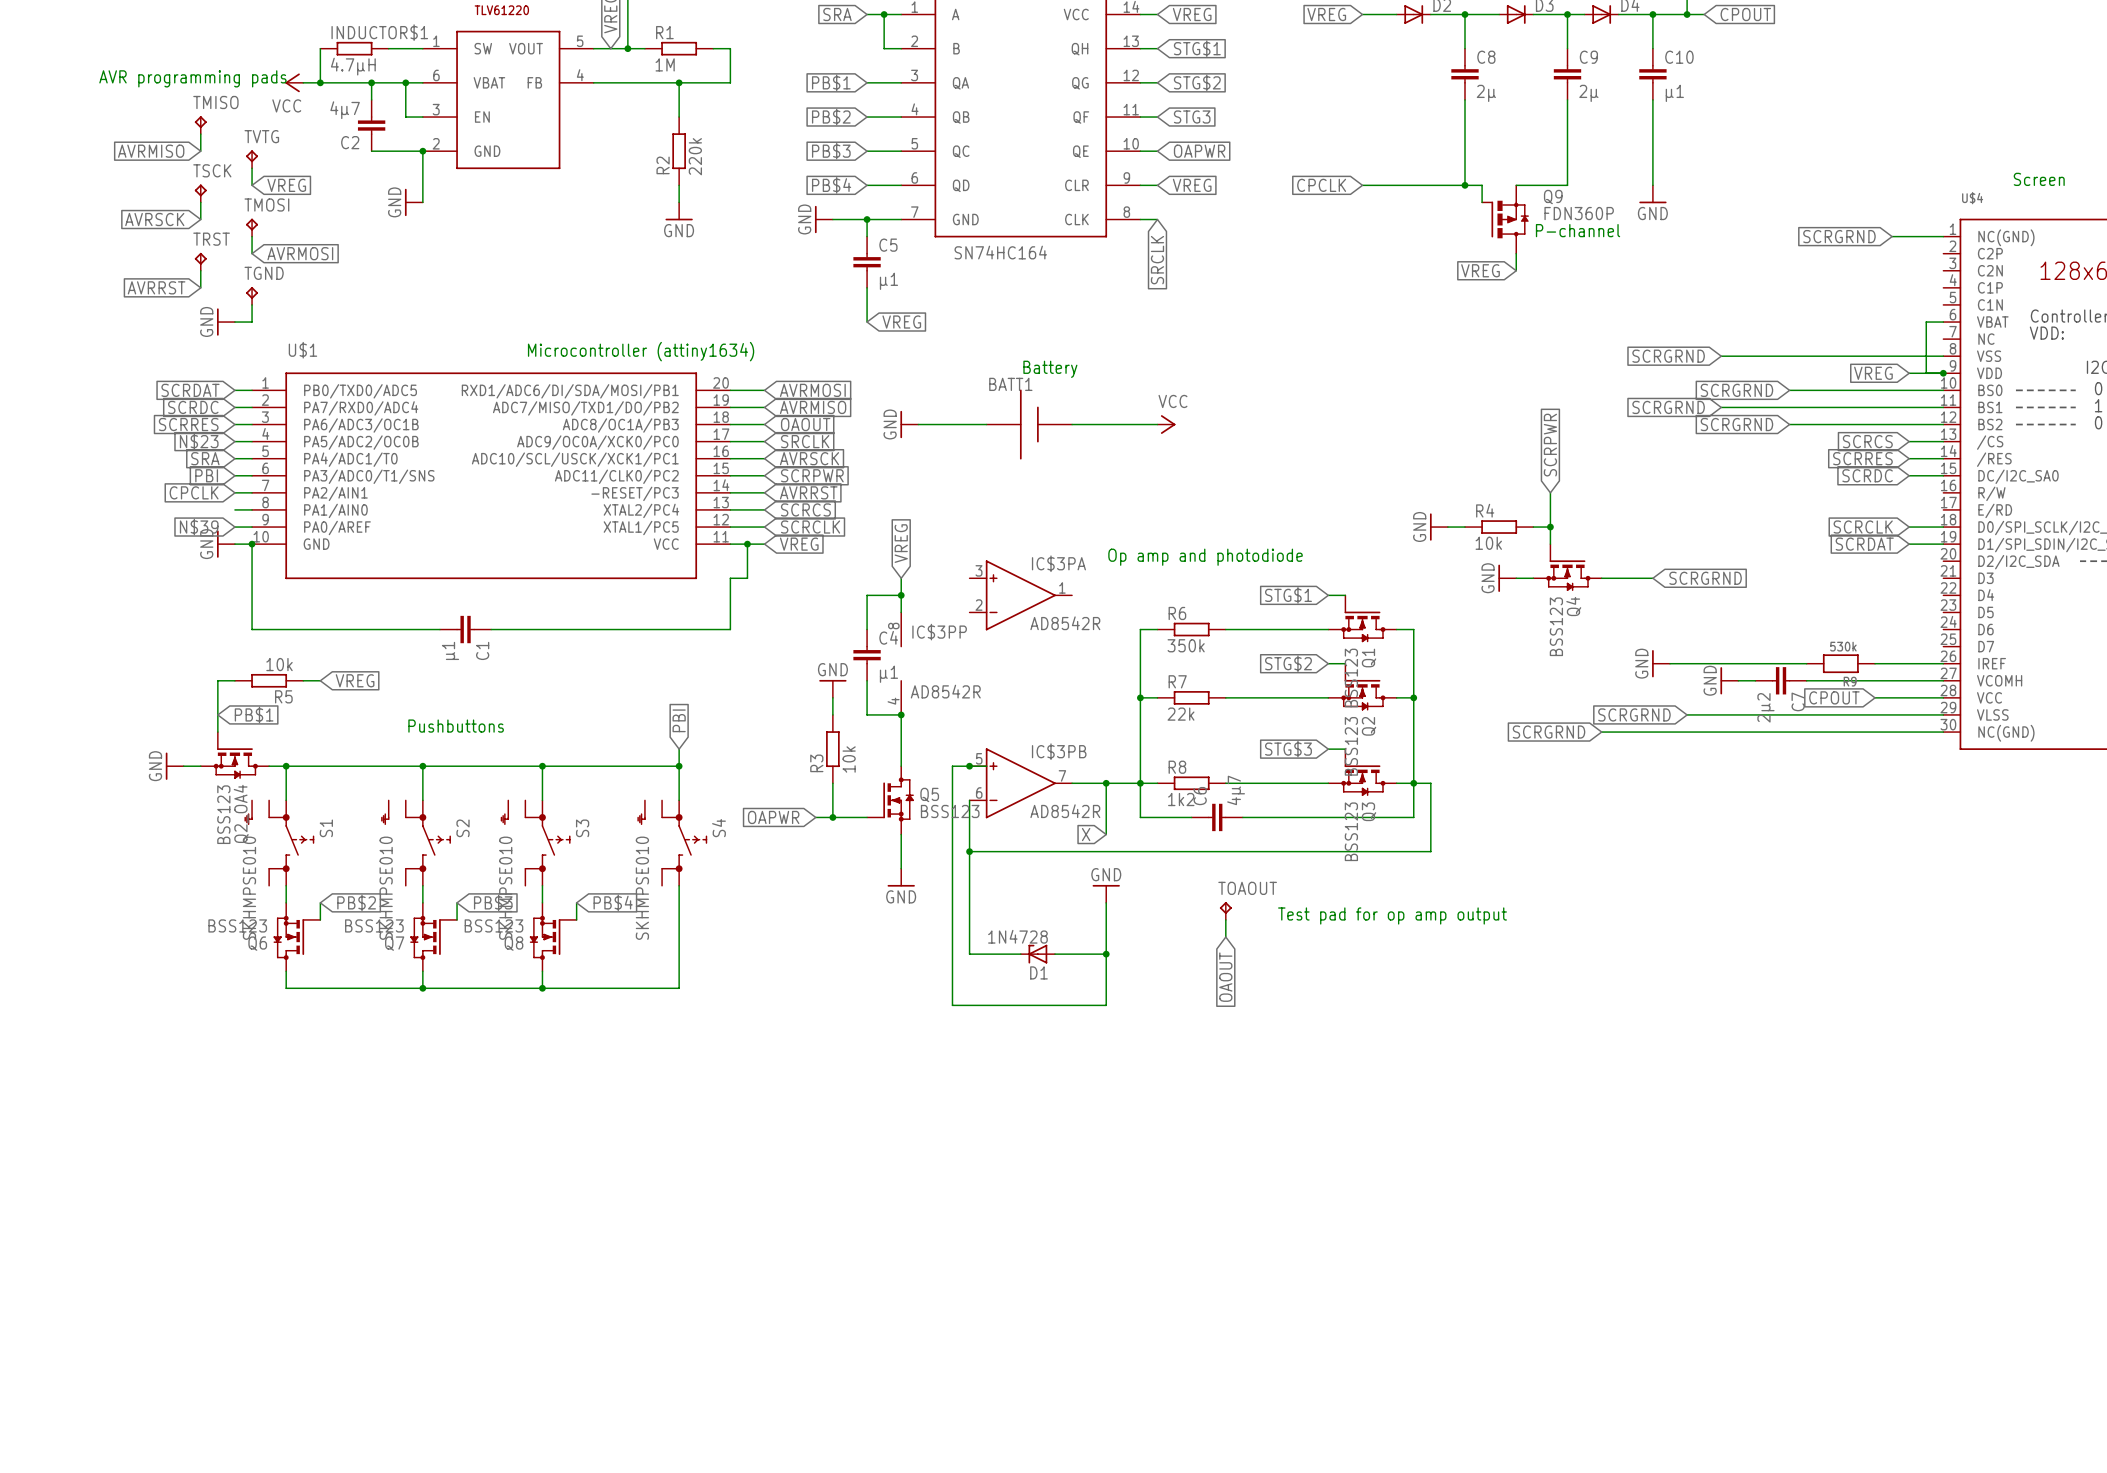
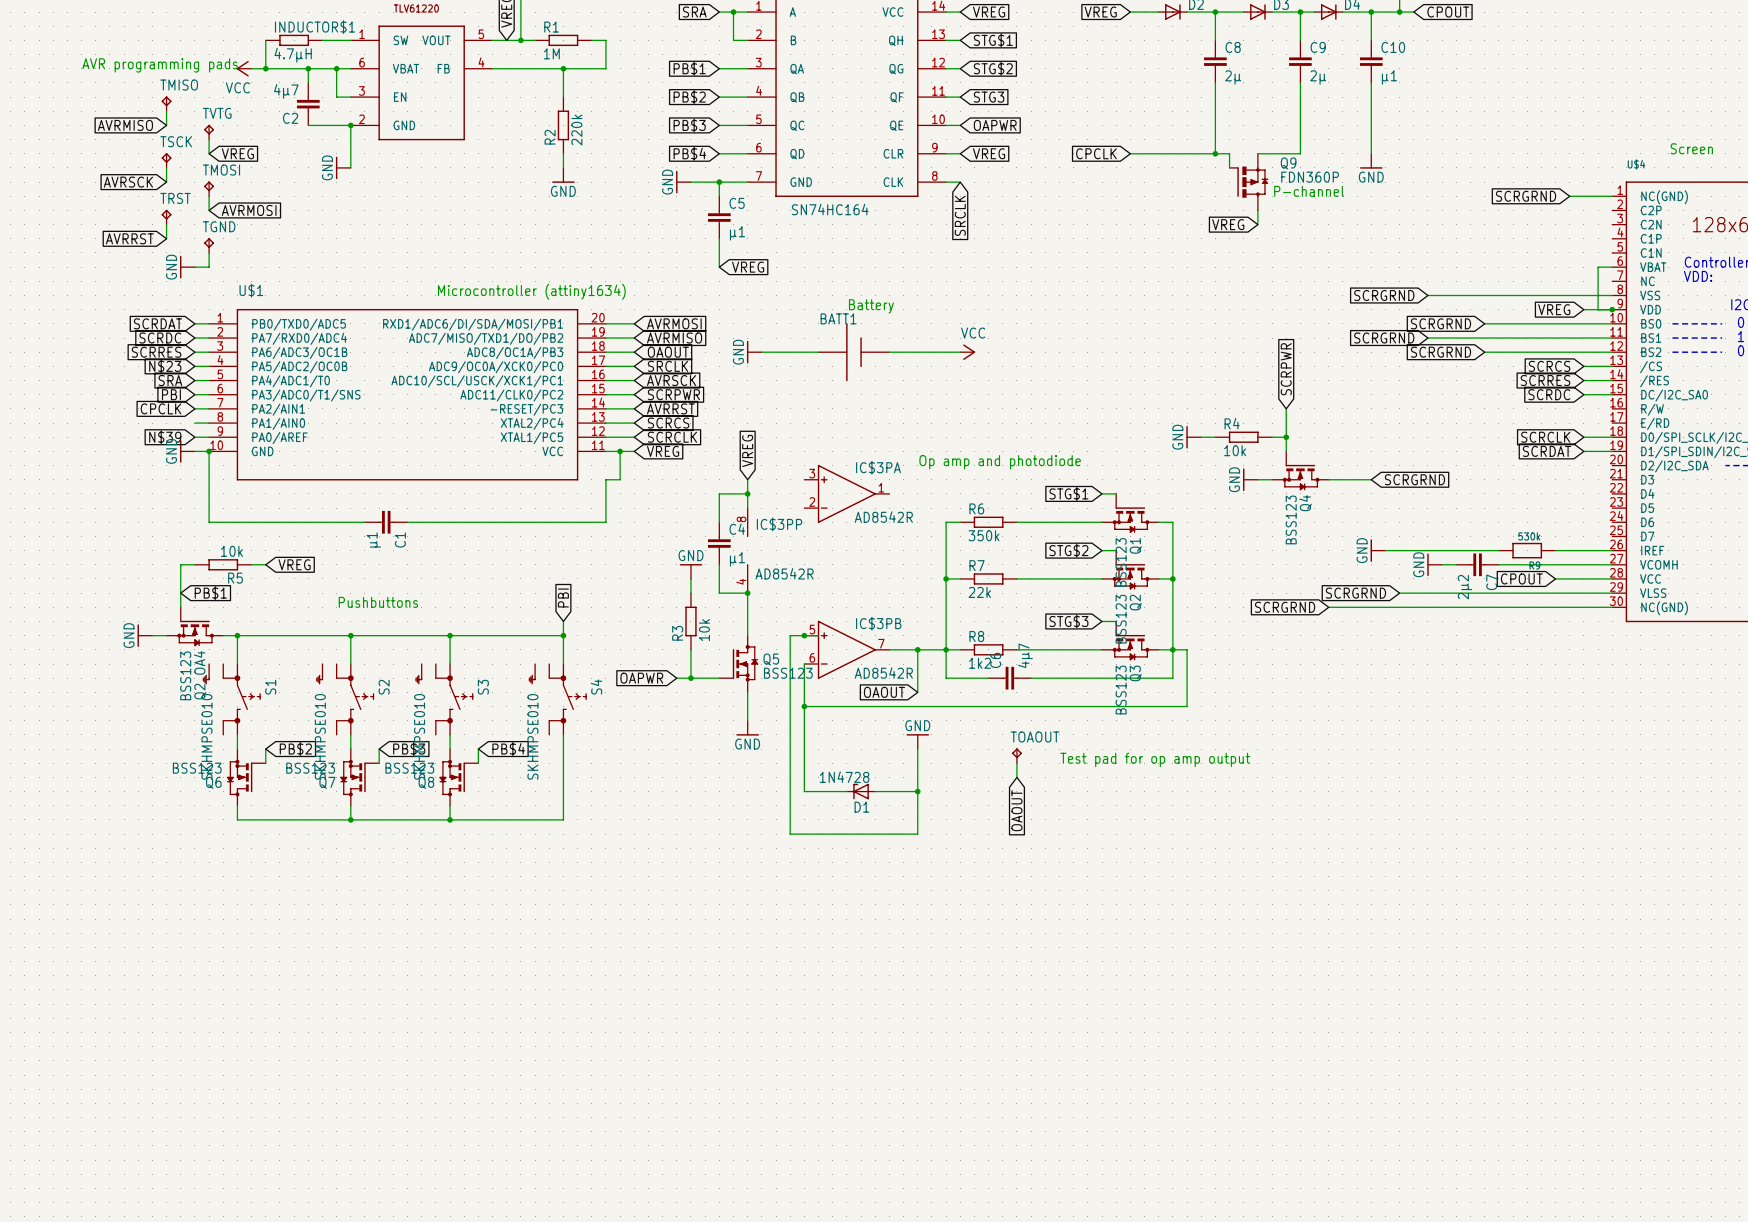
global label: X (1086, 834) -> OAOUT (884, 692)

